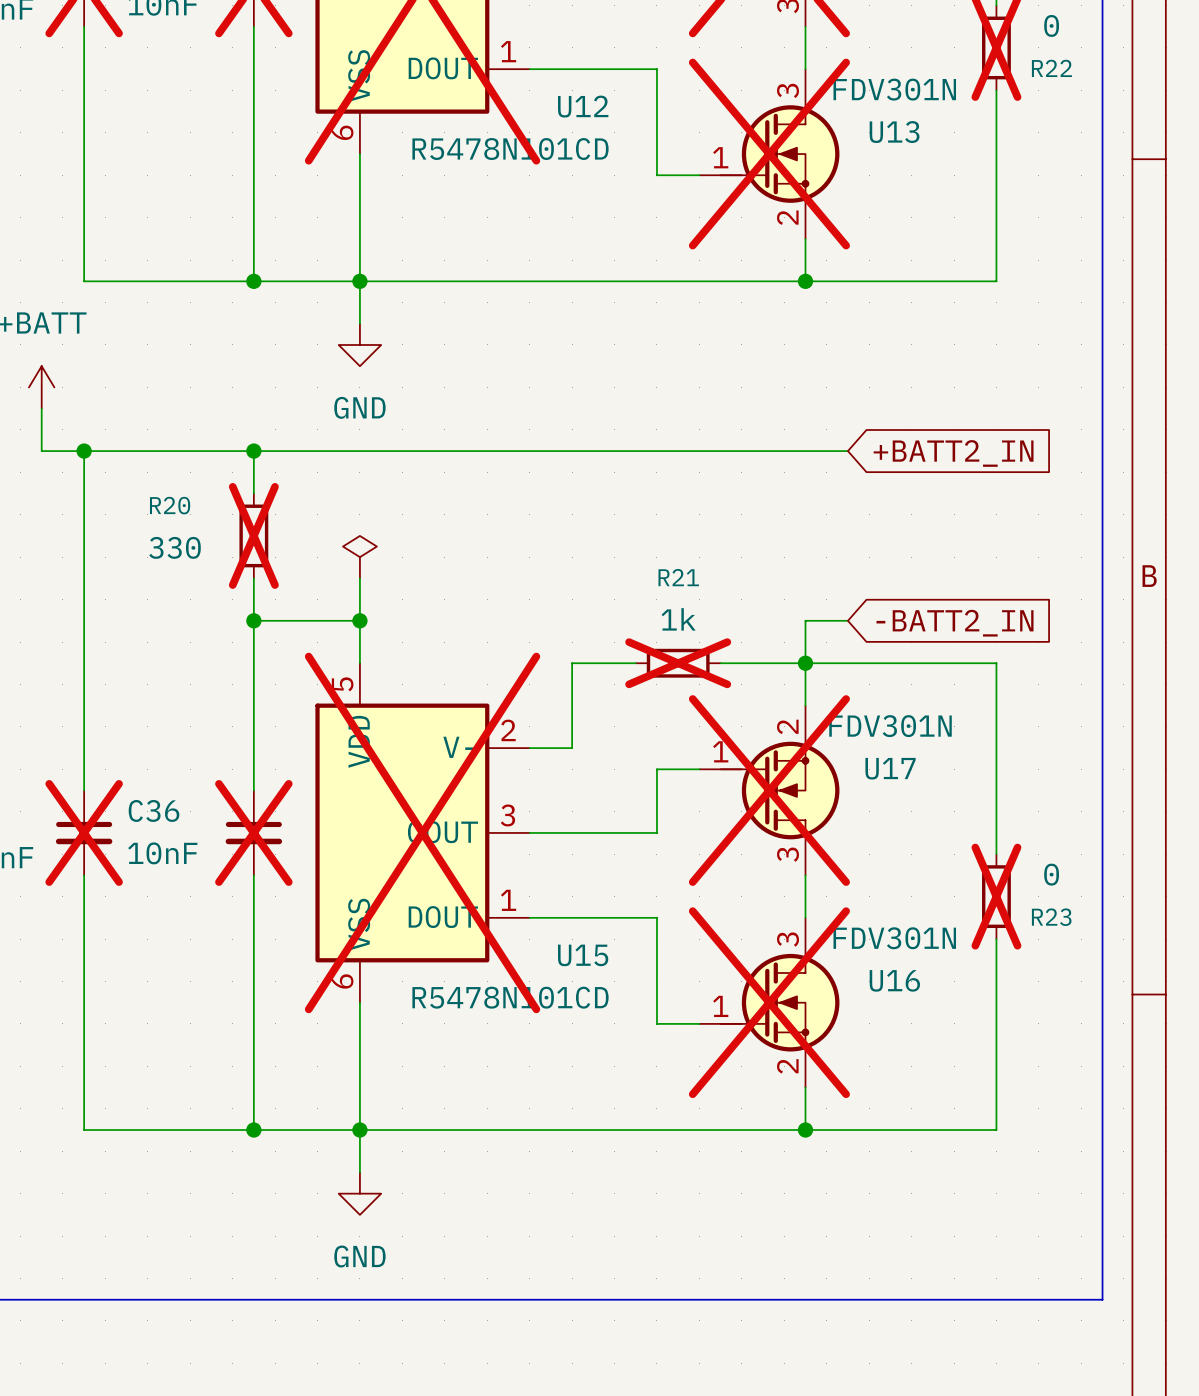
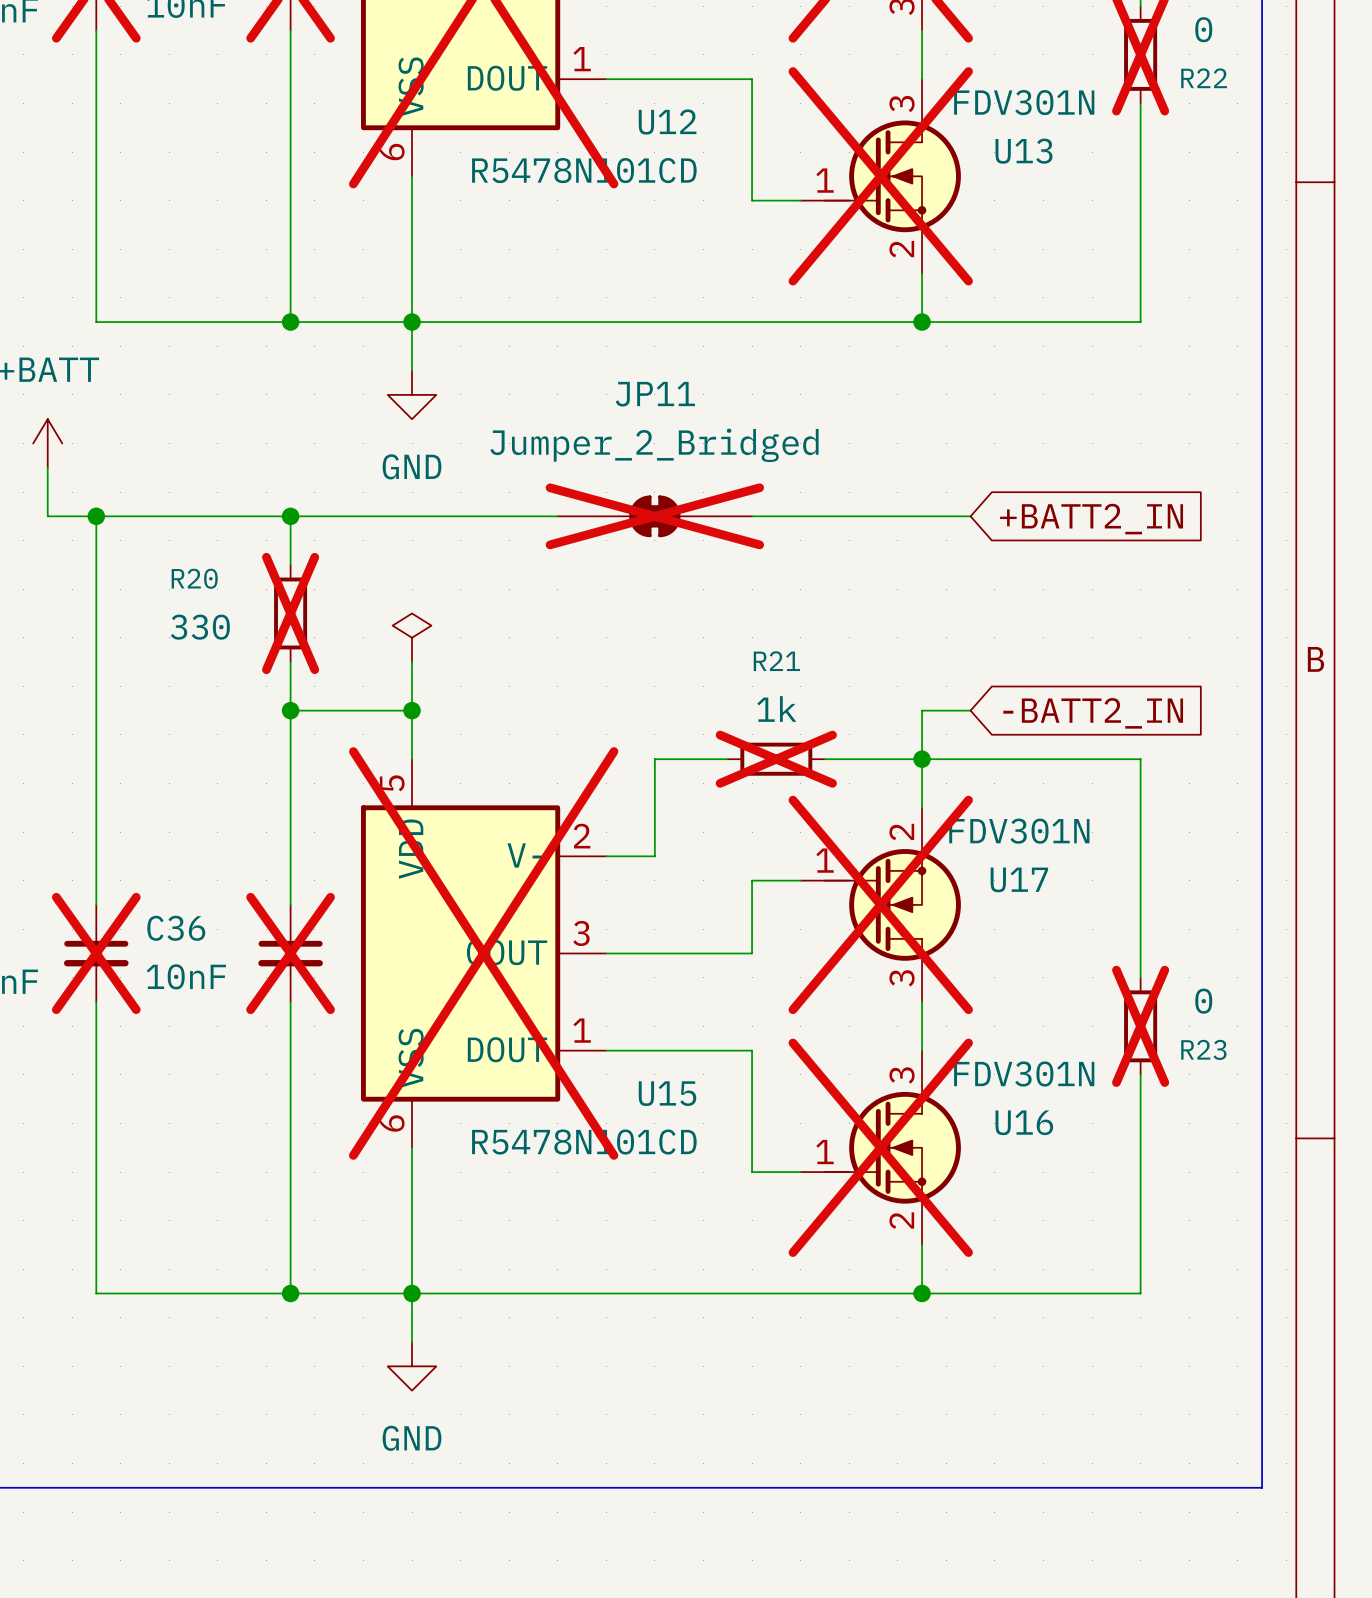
JP11: none -> Jumper_2_Bridged (654, 516)

